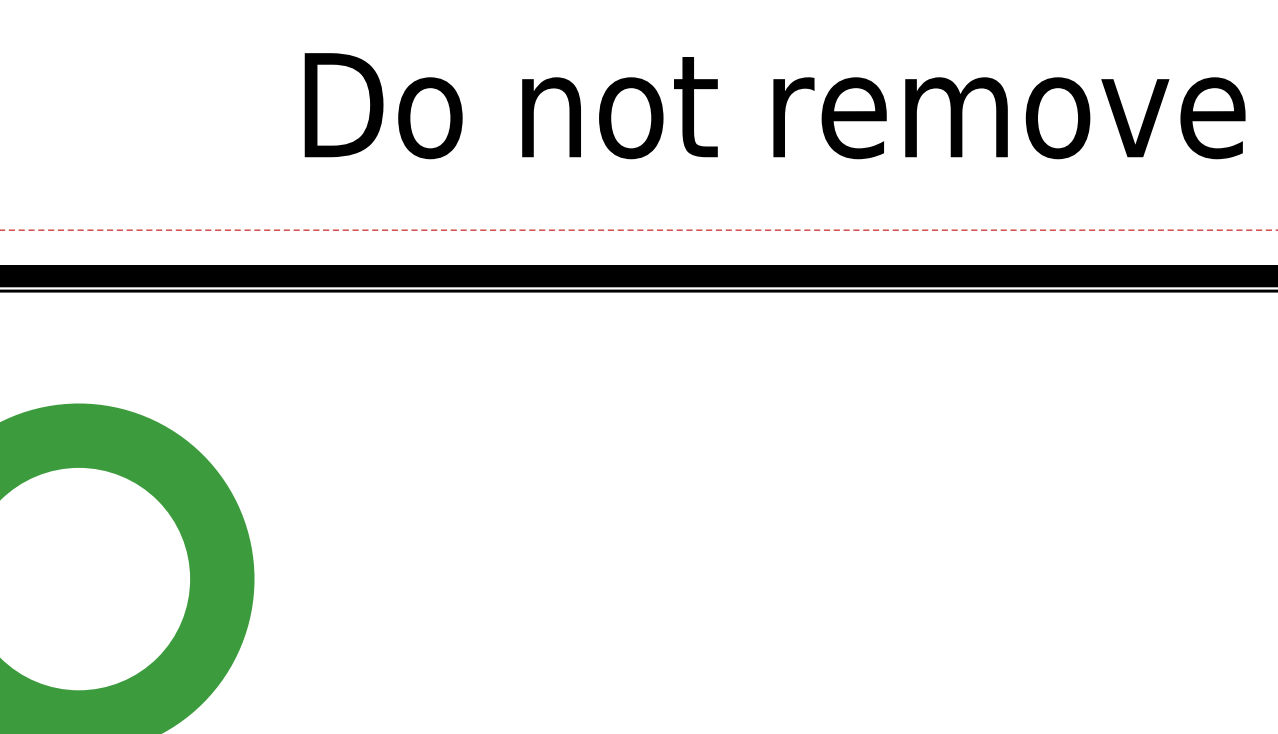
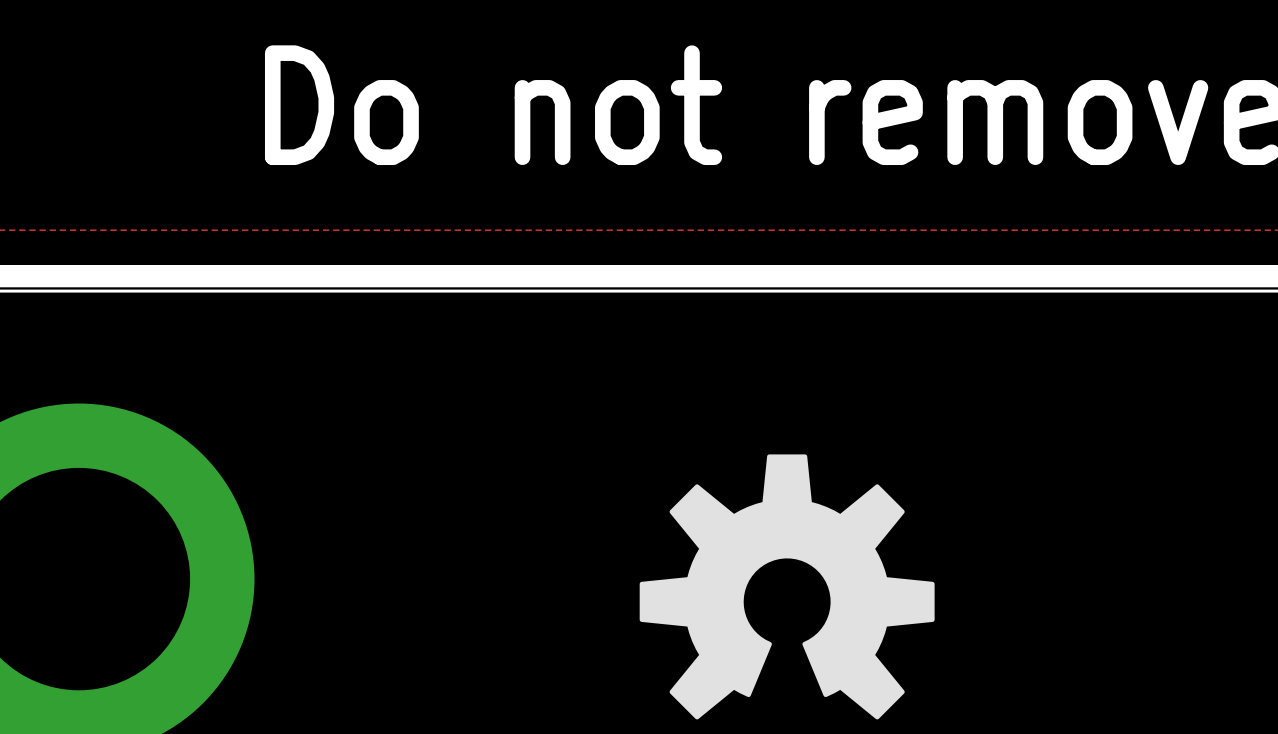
drawing: none -> [639, 454, 935, 720]

